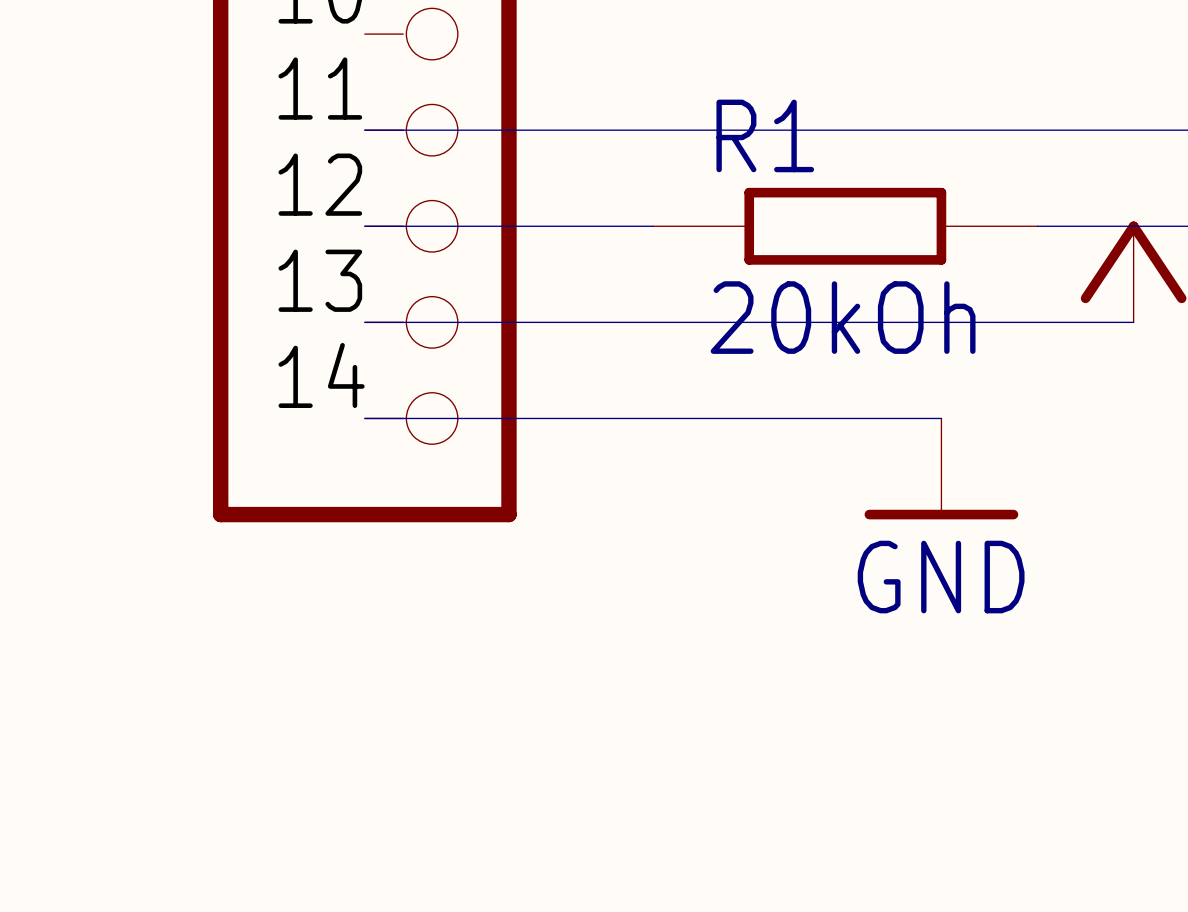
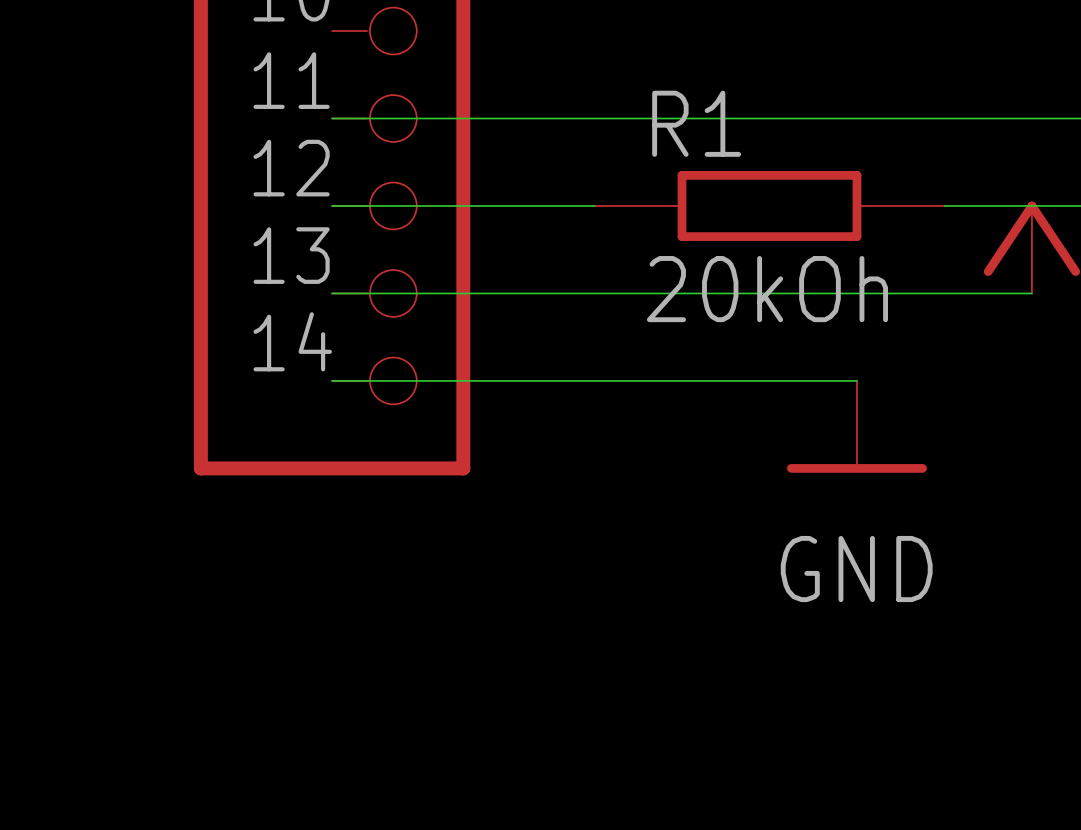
power symbol text position: GND (941, 577) -> GND (856, 569)

